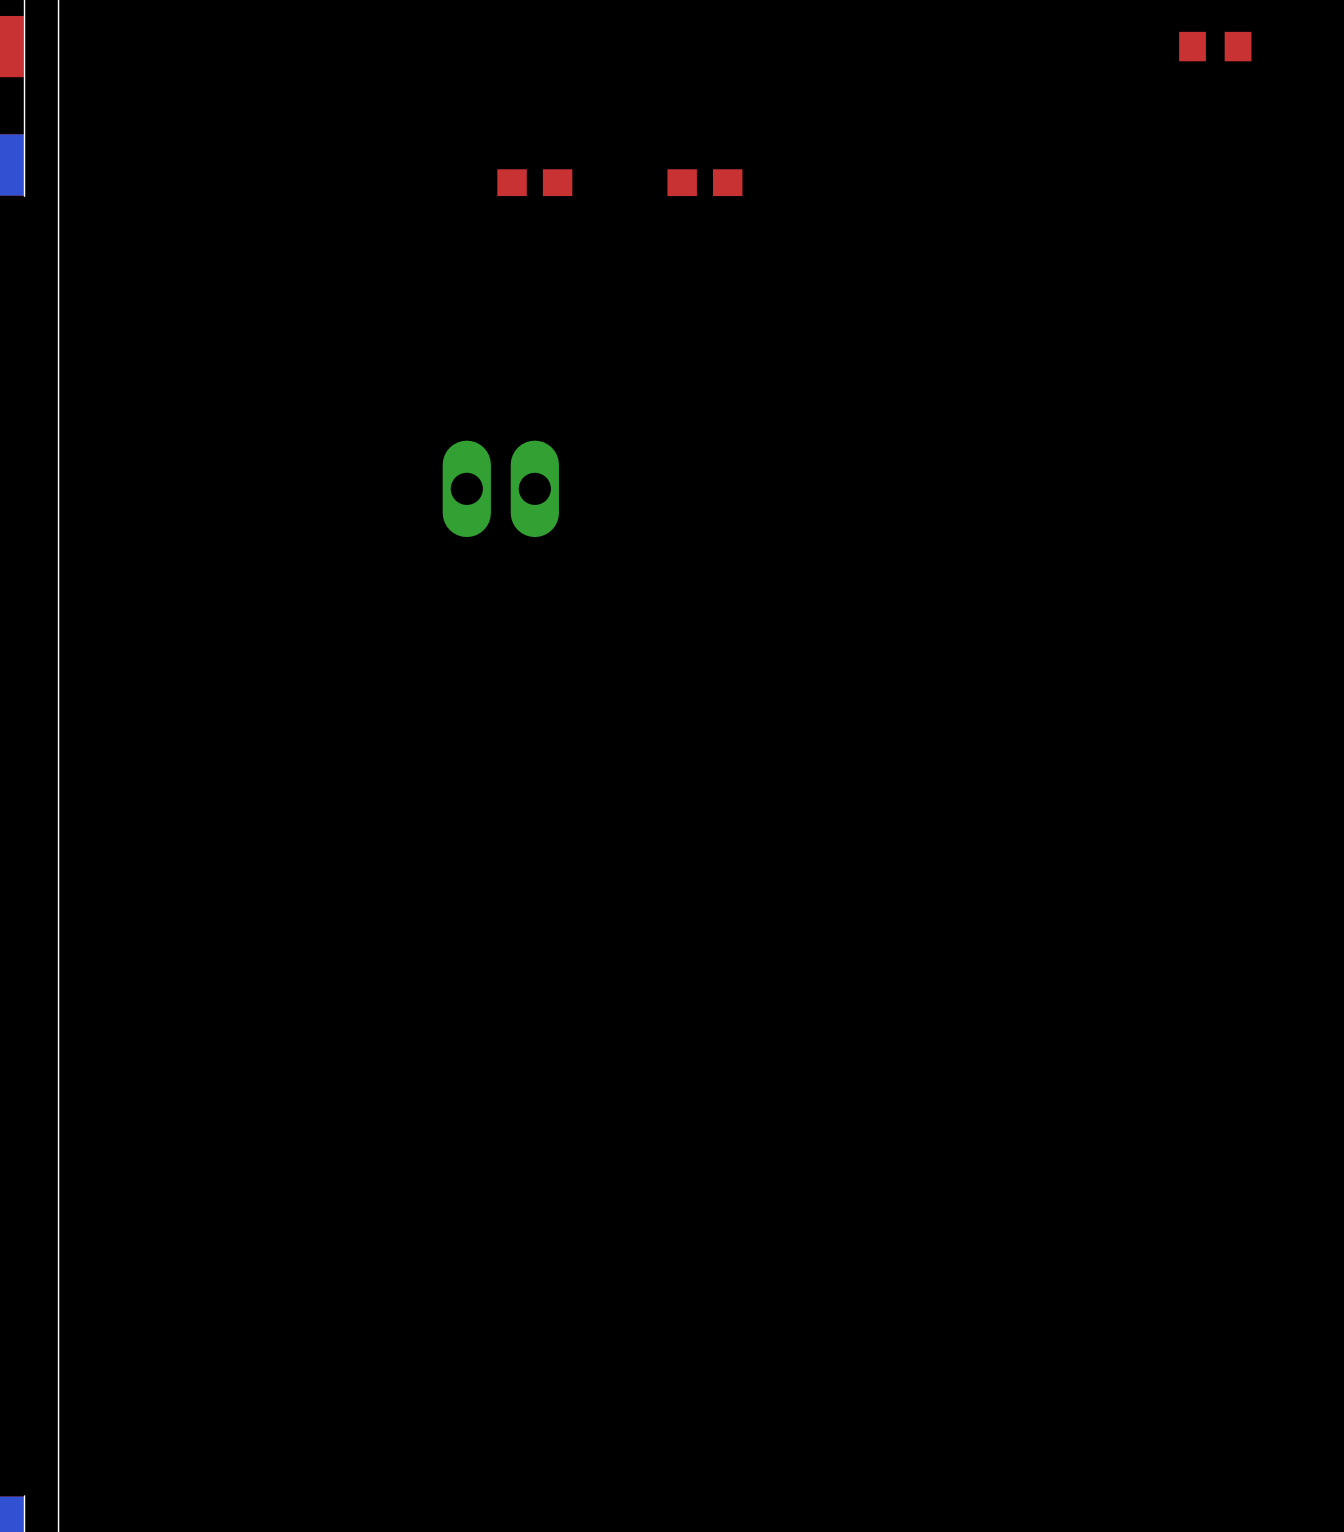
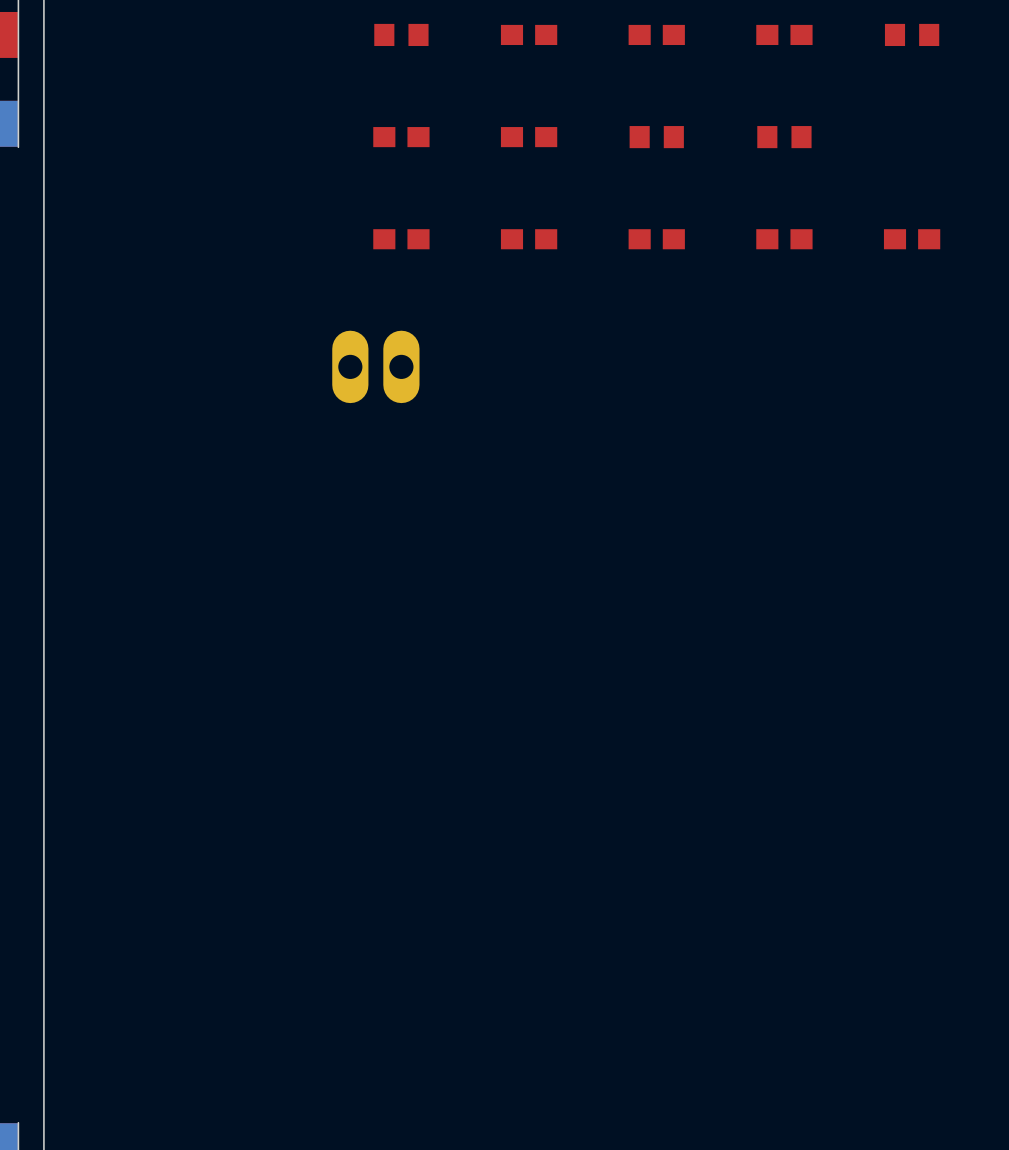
part: none -> (401, 34)
part: none -> (529, 34)
part: none -> (656, 34)
part: none -> (784, 34)
part: none -> (656, 137)
part: none -> (784, 137)
part: none -> (401, 239)
part: none -> (529, 239)
part: none -> (656, 239)
part: none -> (784, 239)
part: none -> (912, 239)

